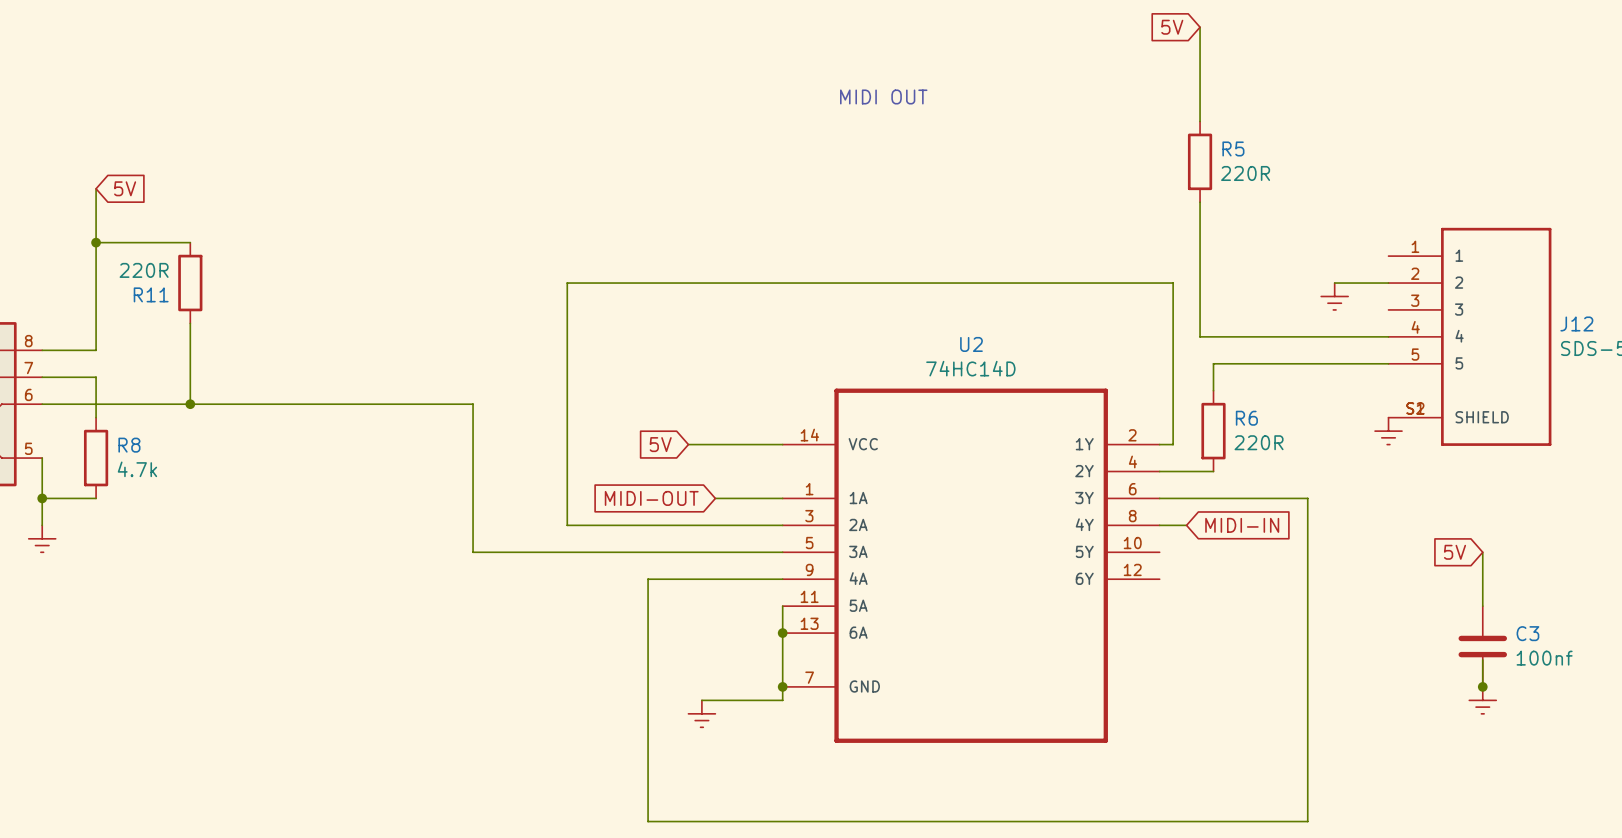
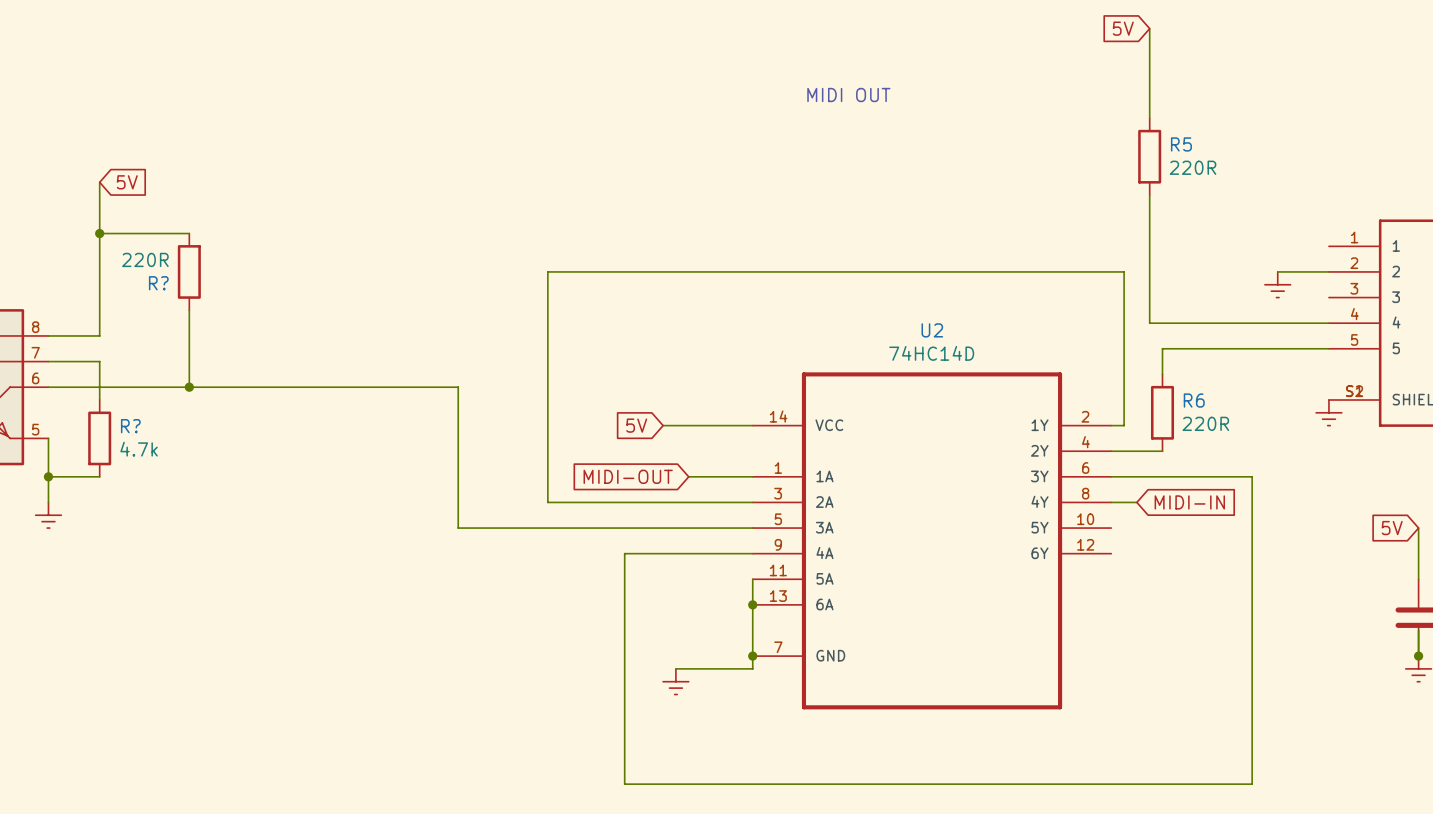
R11 name: R11 (151, 294) -> R? (158, 283)
R8 name: R8 (129, 445) -> R? (130, 426)

